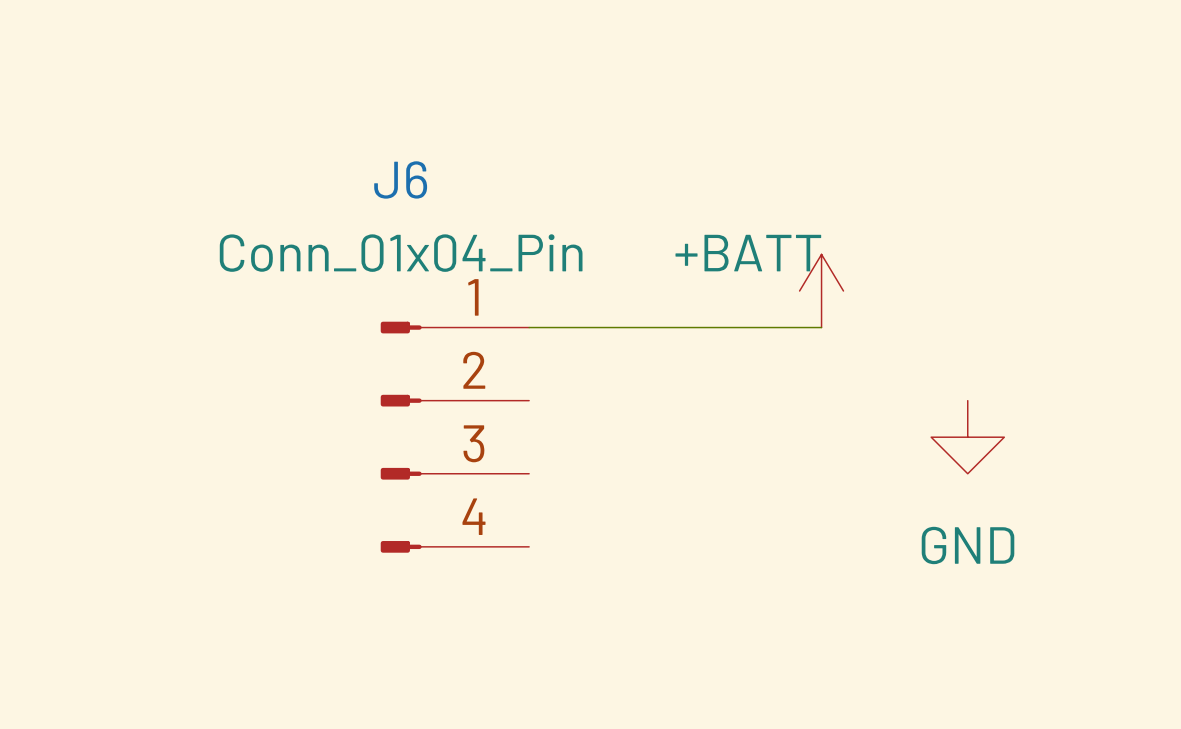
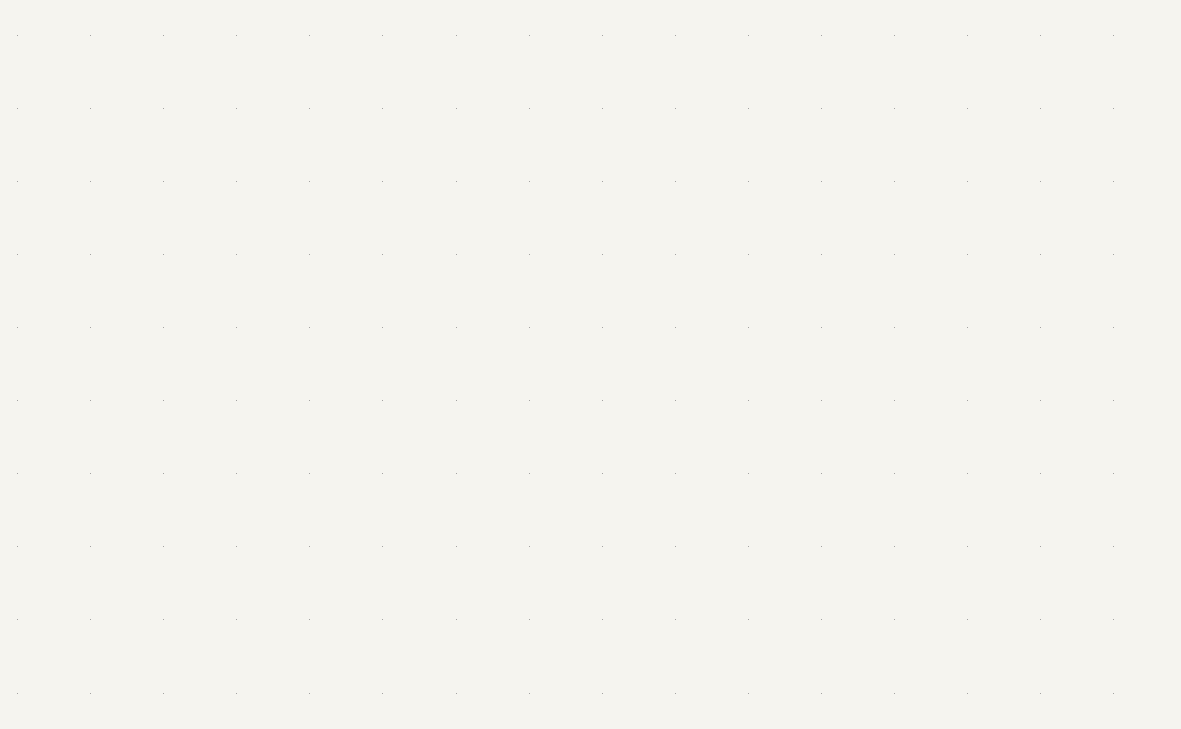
power symbol: +BATT (821, 290) -> none
wire: (529, 327) (821, 327) -> none
J6: Conn_01x04_Pin (454, 437) -> none
power symbol: GND (967, 437) -> none

